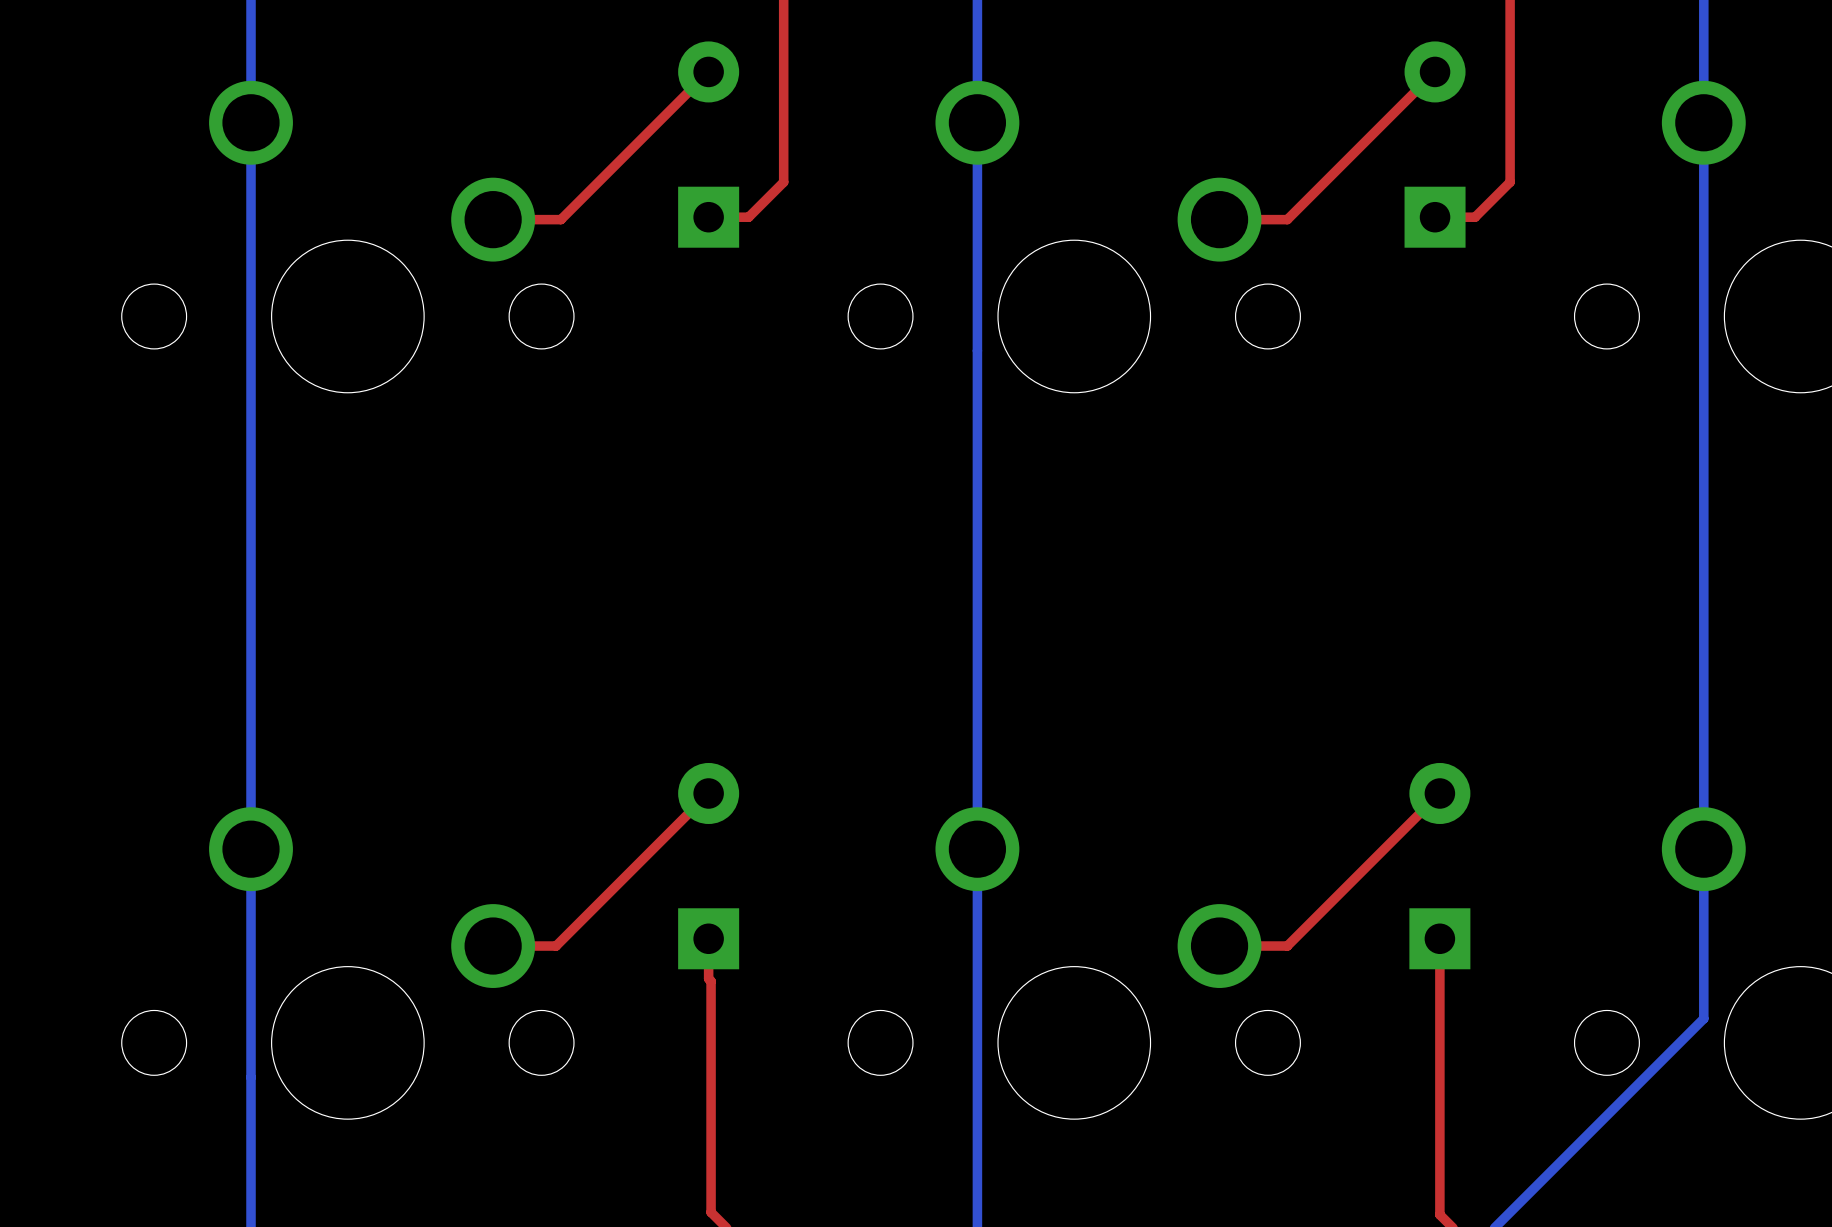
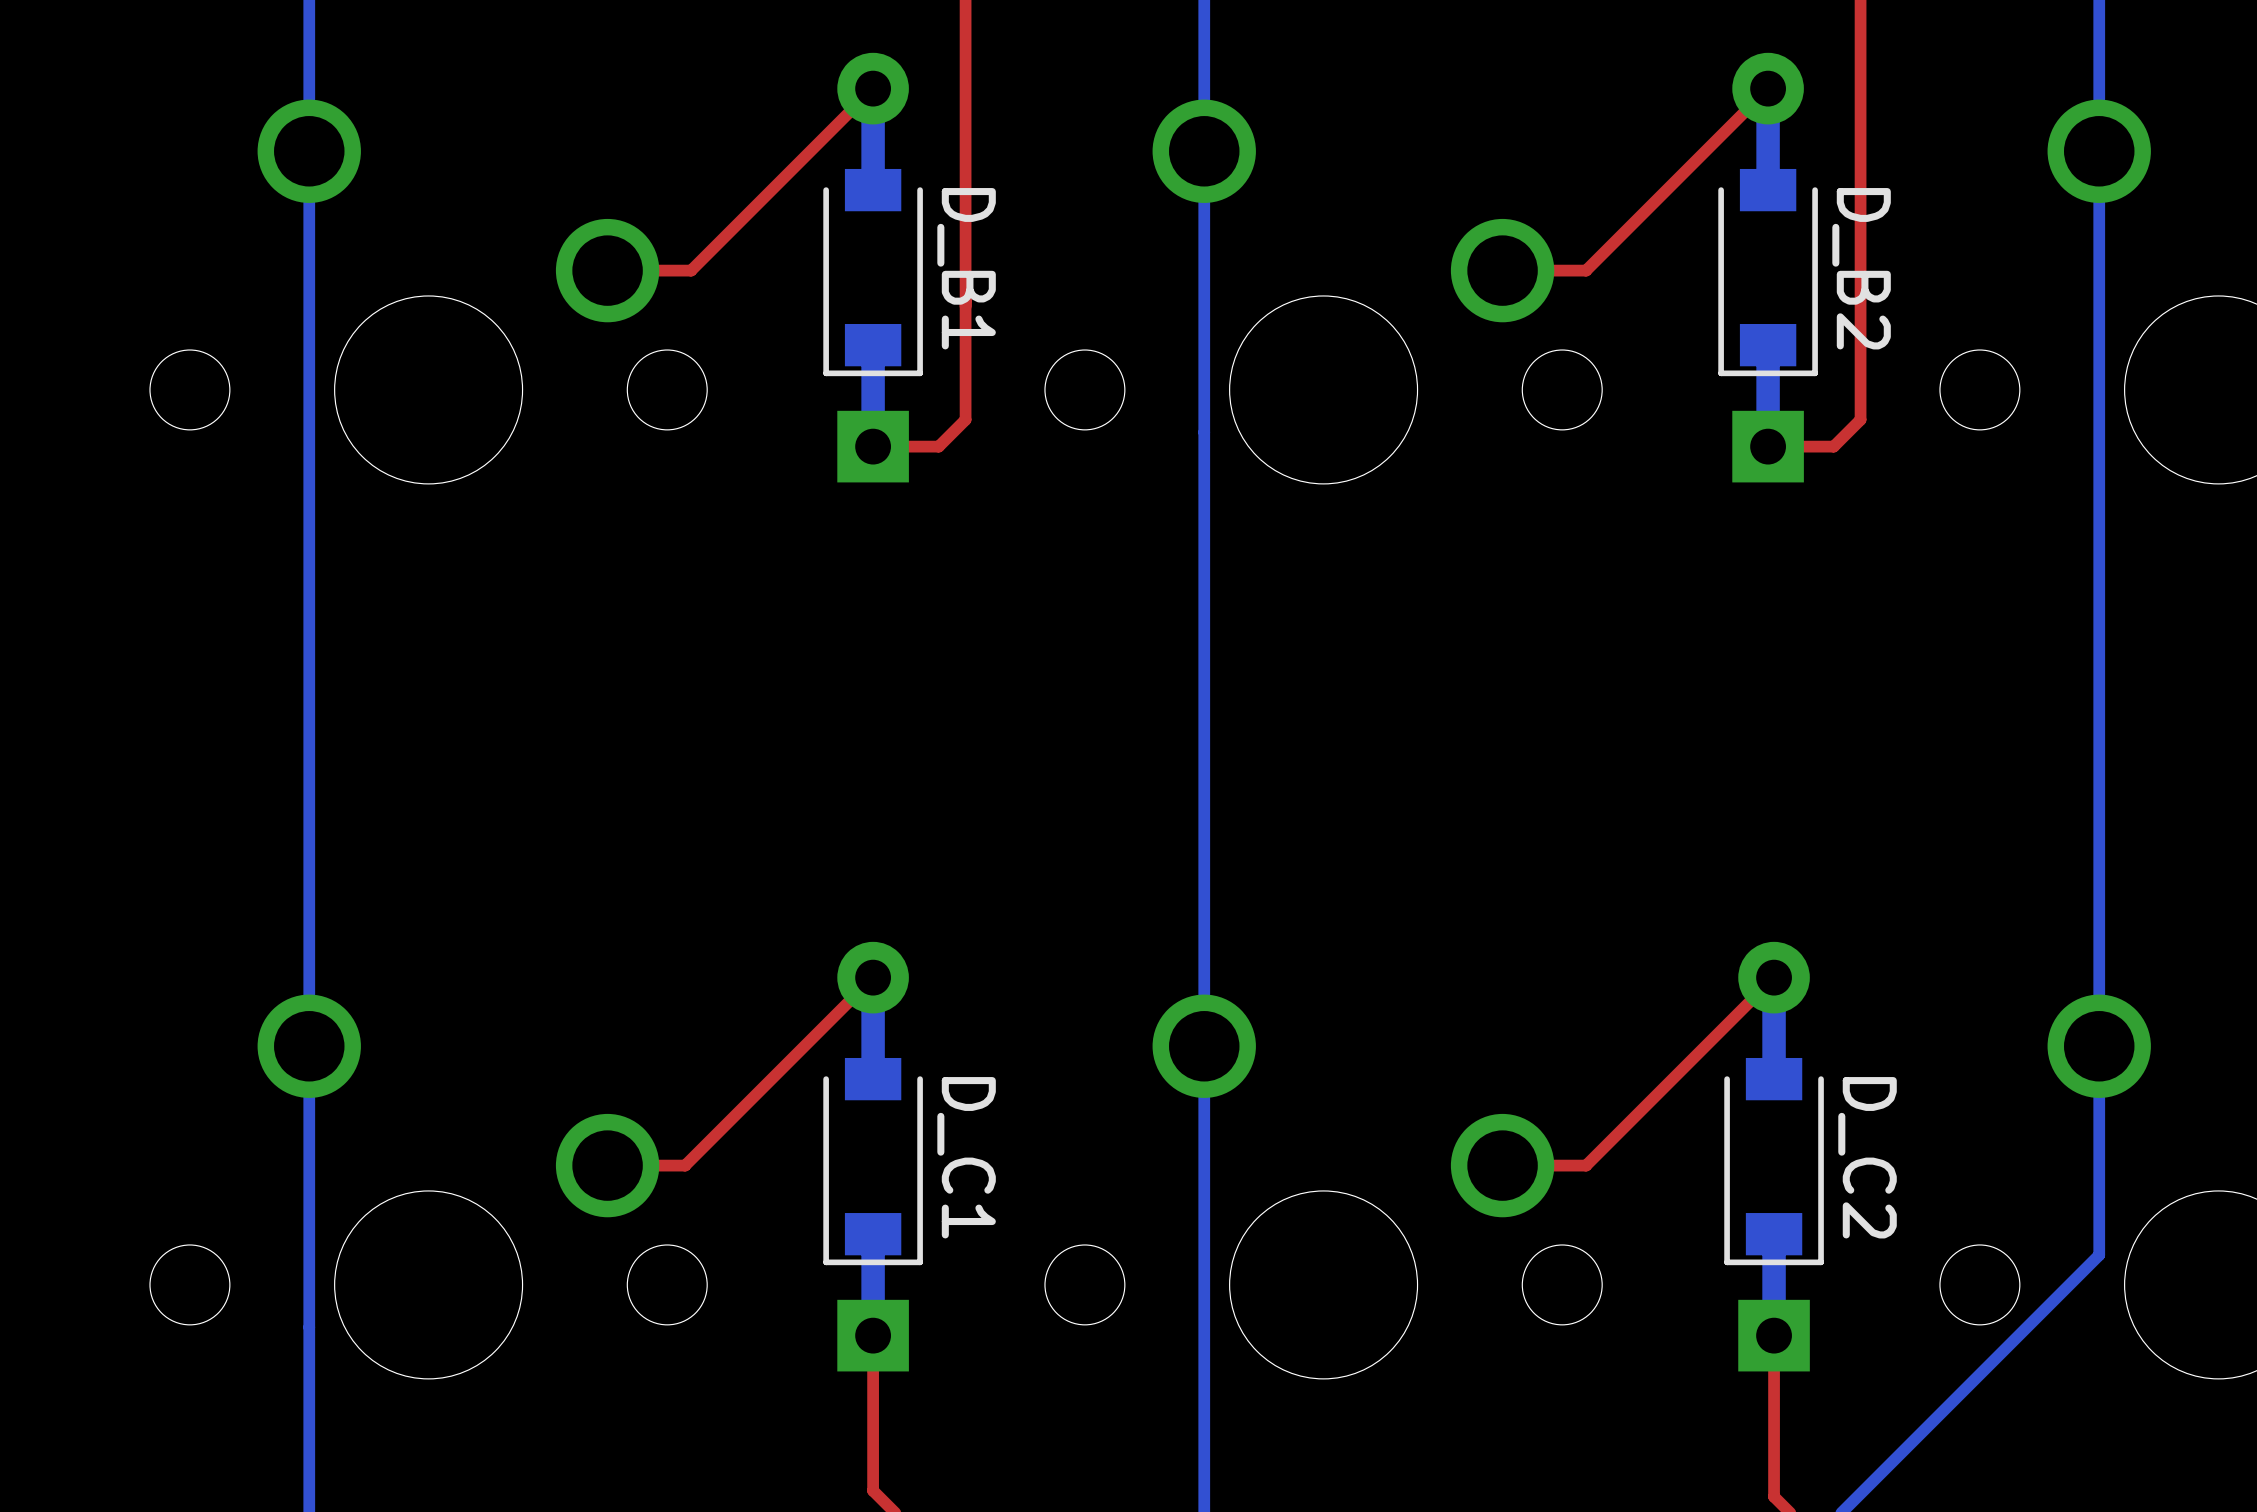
part: (708, 144) -> none
part: (1435, 144) -> none
top track: (783, 182) (748, 217) (708, 217) -> (965, 224) (965, 419) (938, 446) (873, 446)
top track: (1510, 182) (1475, 217) (1435, 217) -> (1860, 224) (1860, 419) (1833, 446) (1768, 446)
D_B1: none -> (873, 267)
D_B2: none -> (1768, 267)
part: (708, 866) -> none
part: (1439, 866) -> none
top track: (708, 938) (708, 978) (711, 981) (711, 1212) -> (873, 1335) (873, 1490) (876, 1493)
D_C1: none -> (873, 1156)
top track: (1439, 938) (1439, 1084) -> none
D_C2: none -> (1774, 1156)

